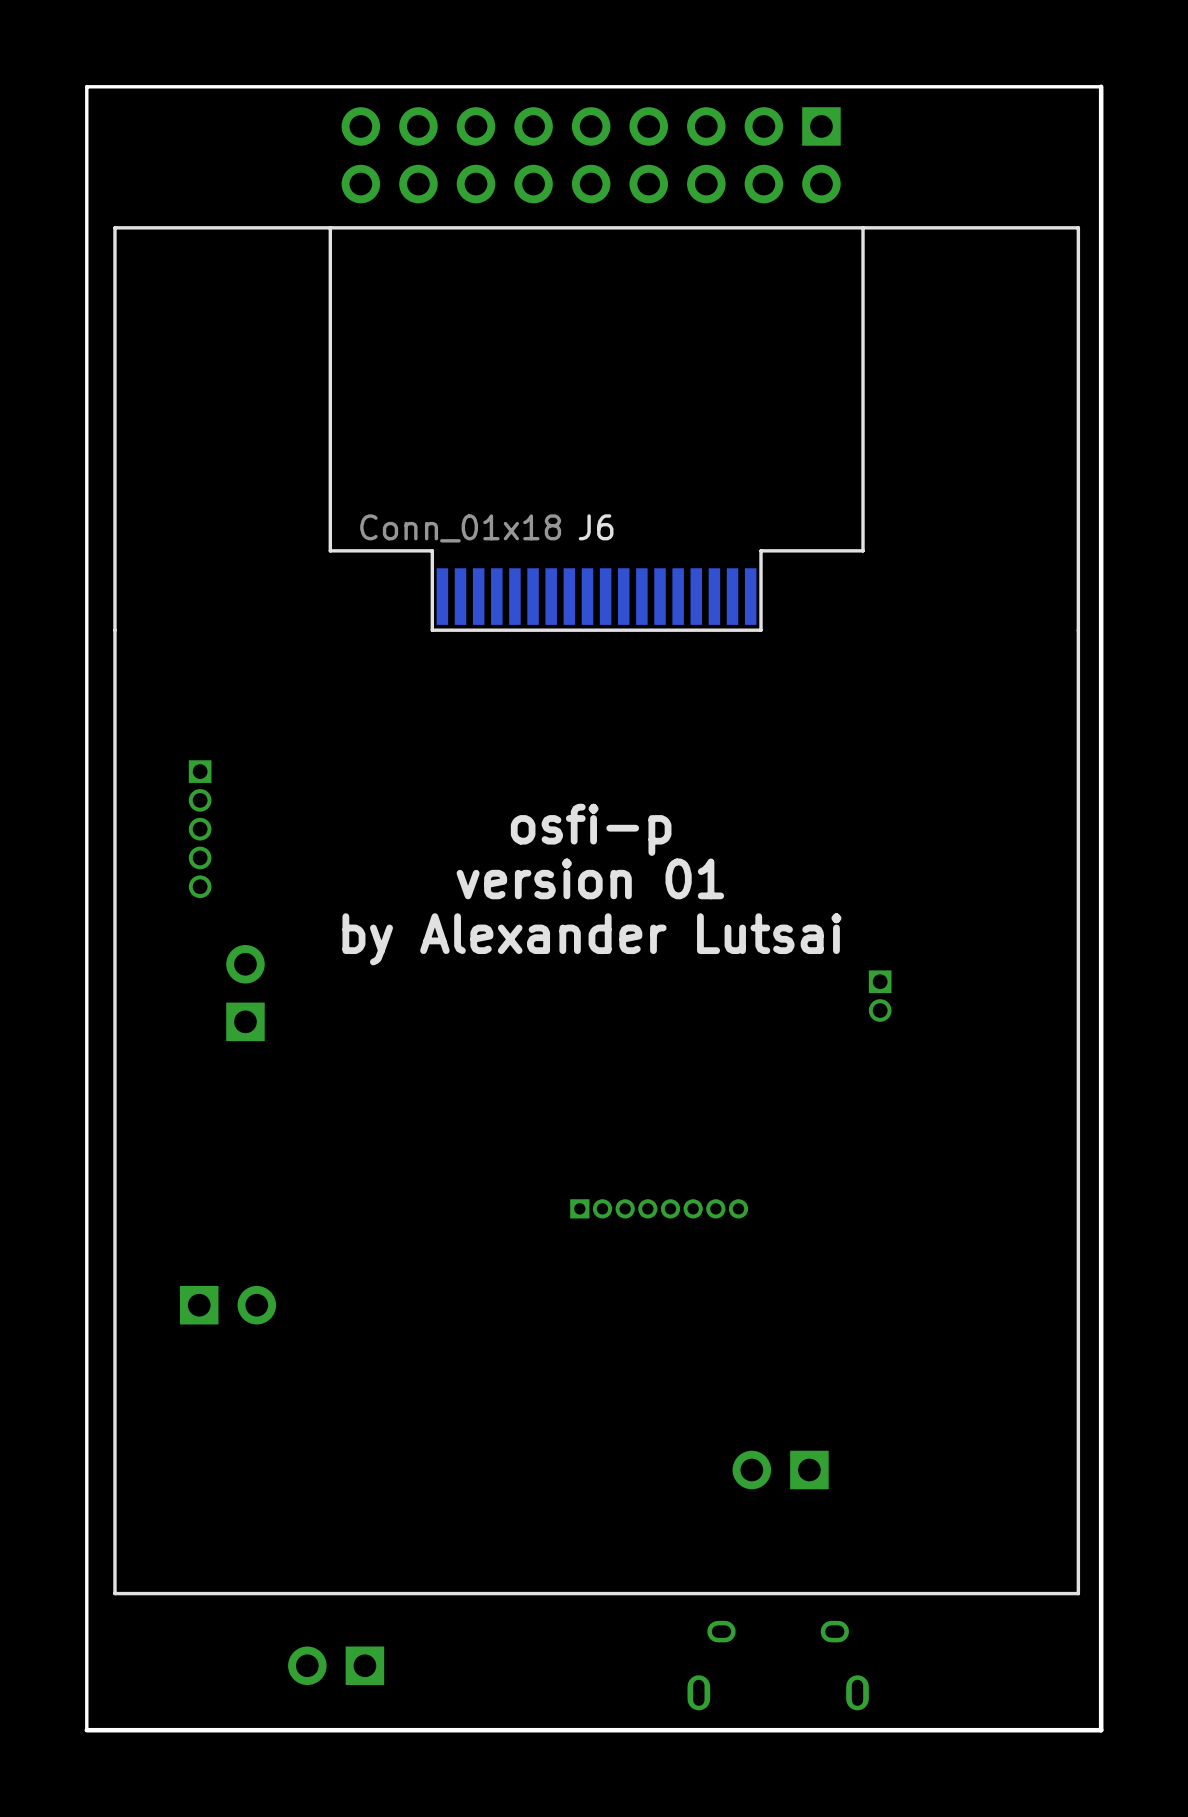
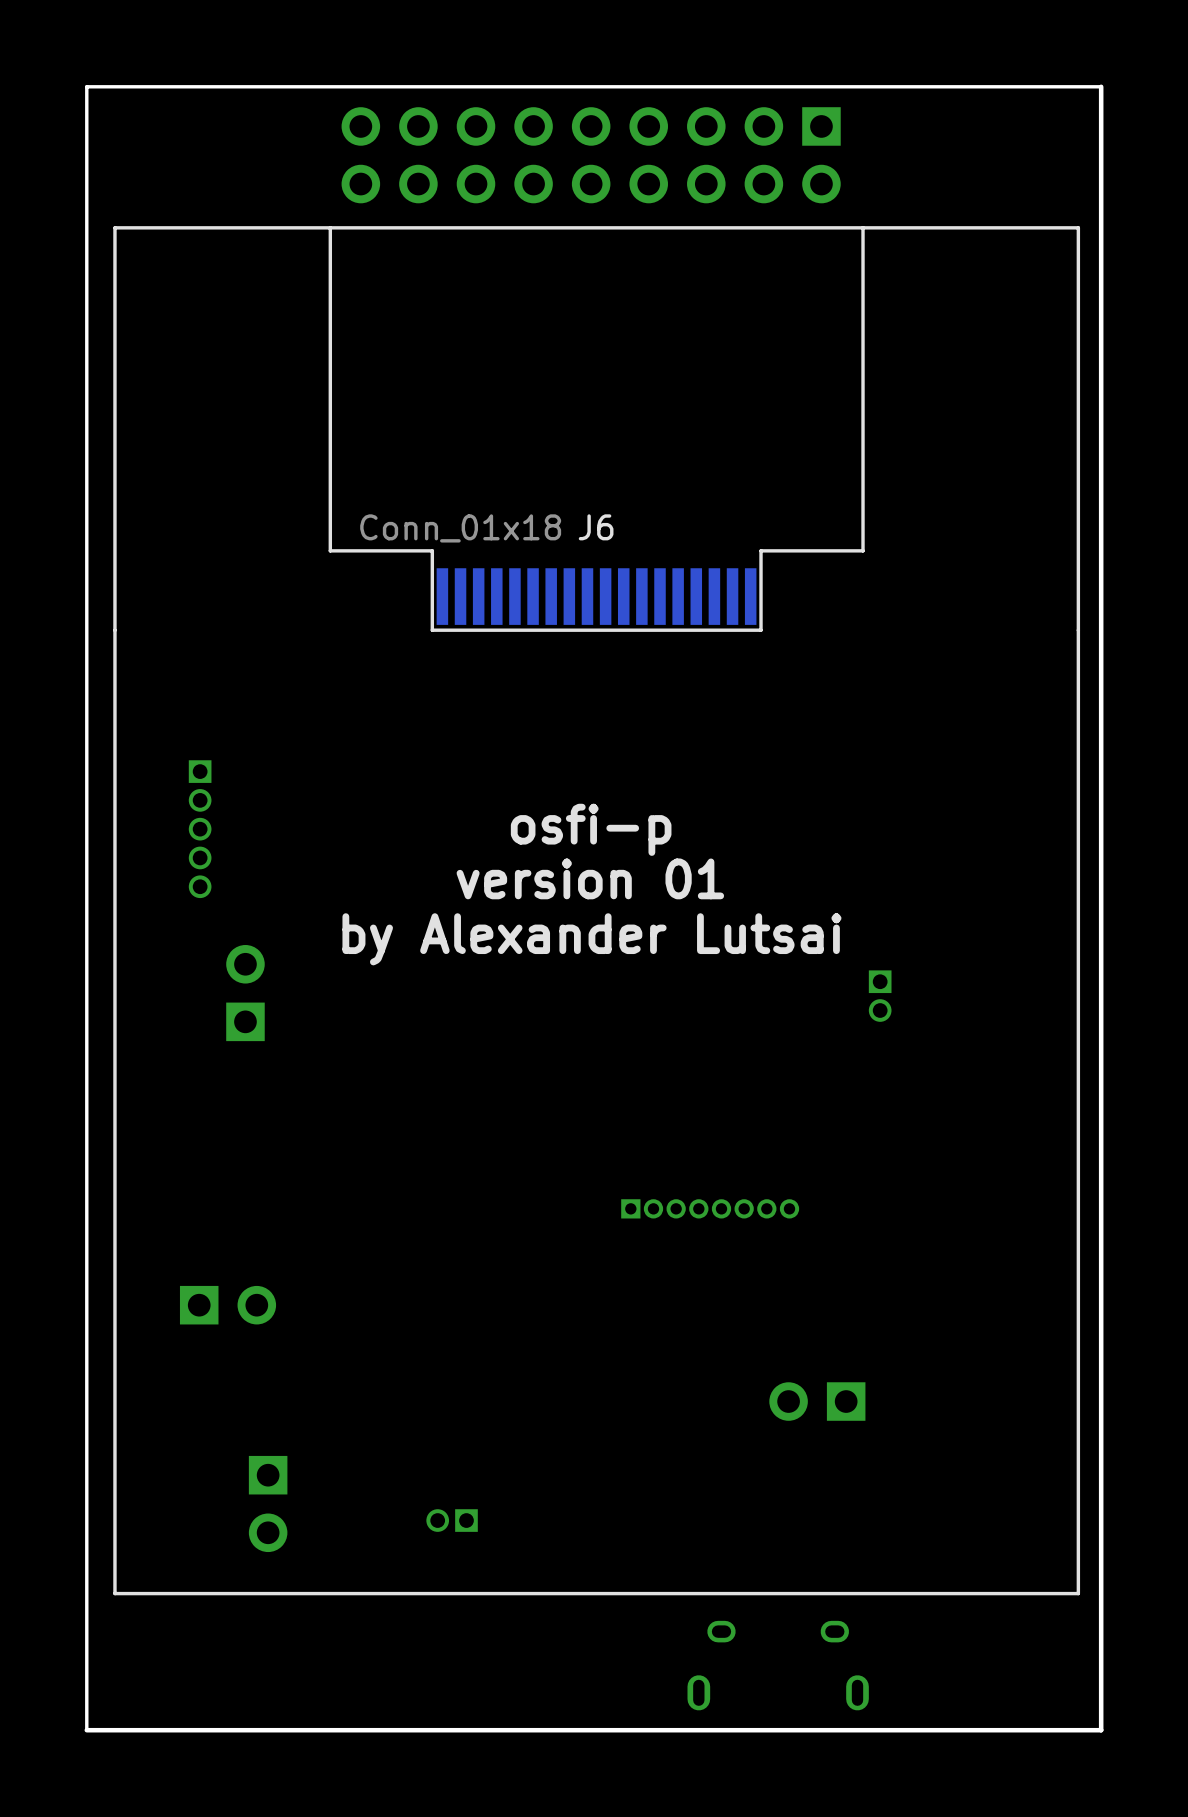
part position: (659, 1208) -> (710, 1208)
part position: (780, 1470) -> (817, 1401)
part: none -> (452, 1520)
part rotation: 0° (336, 1665) -> 90° counterclockwise (268, 1503)
part position: (336, 1665) -> (268, 1503)

